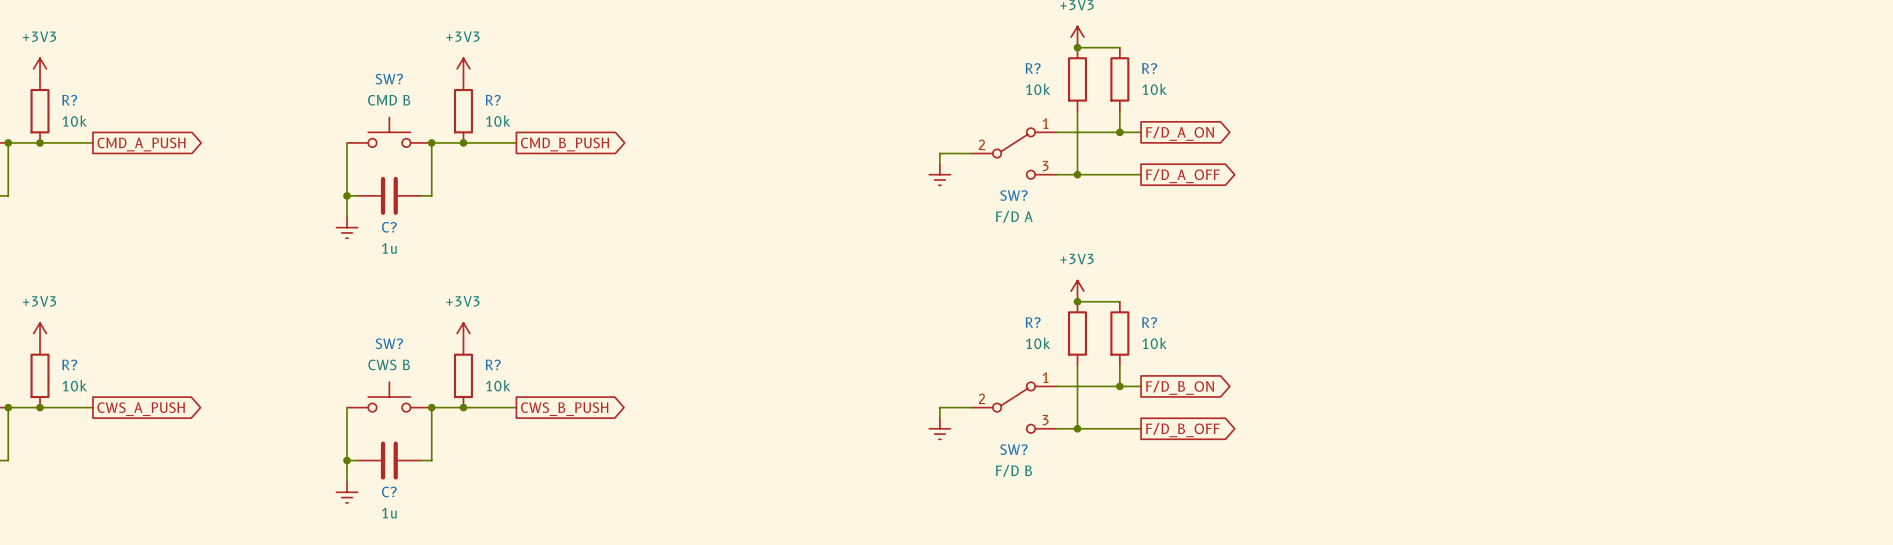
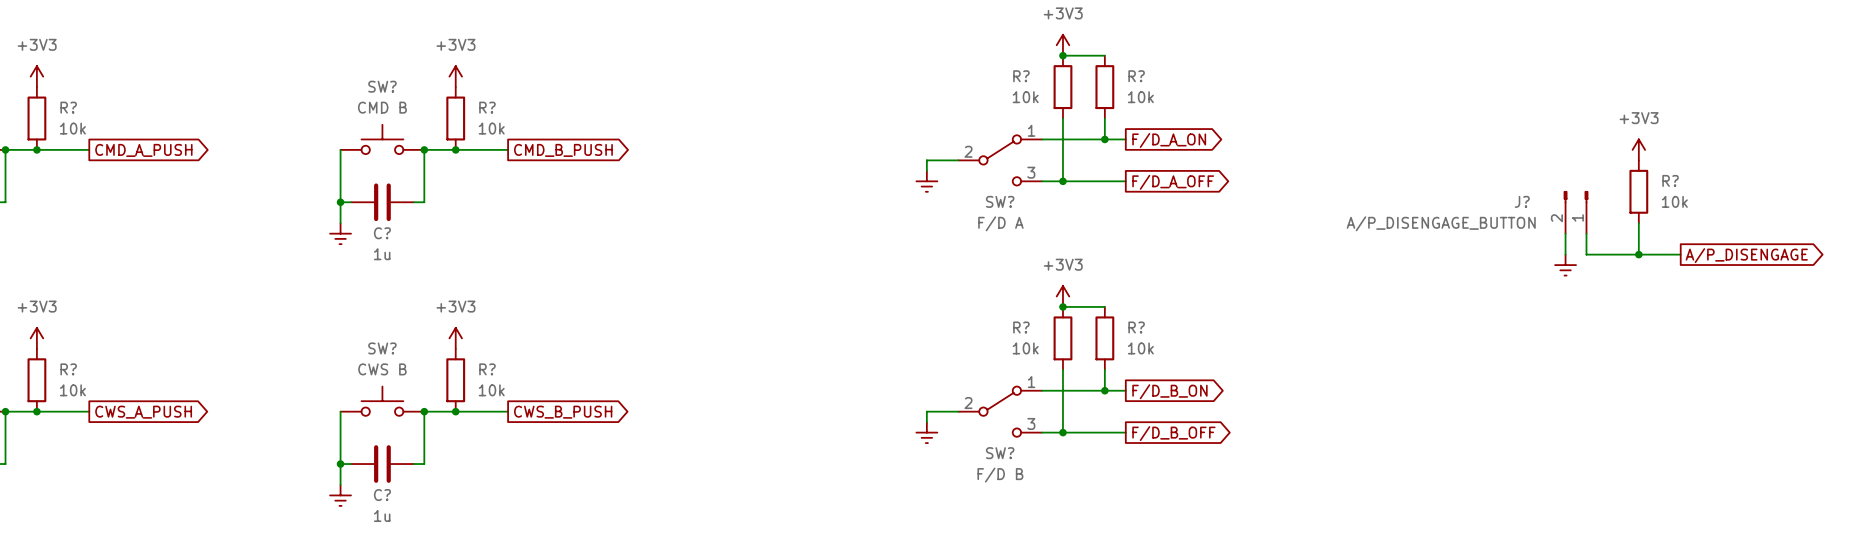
power symbol: none -> +3V3 (1638, 149)
R?: none -> 10k (1638, 191)
J?: none -> A/P_DISENGAGE_BUTTON (1576, 212)
wire: none -> (1638, 223) (1638, 254)
wire: none -> (1565, 233) (1565, 254)
wire: none -> (1586, 233) (1586, 254) (1680, 254)
junction: none -> (1638, 254)
global label: none -> A/P_DISENGAGE (1746, 255)
power symbol: none -> (1565, 265)

